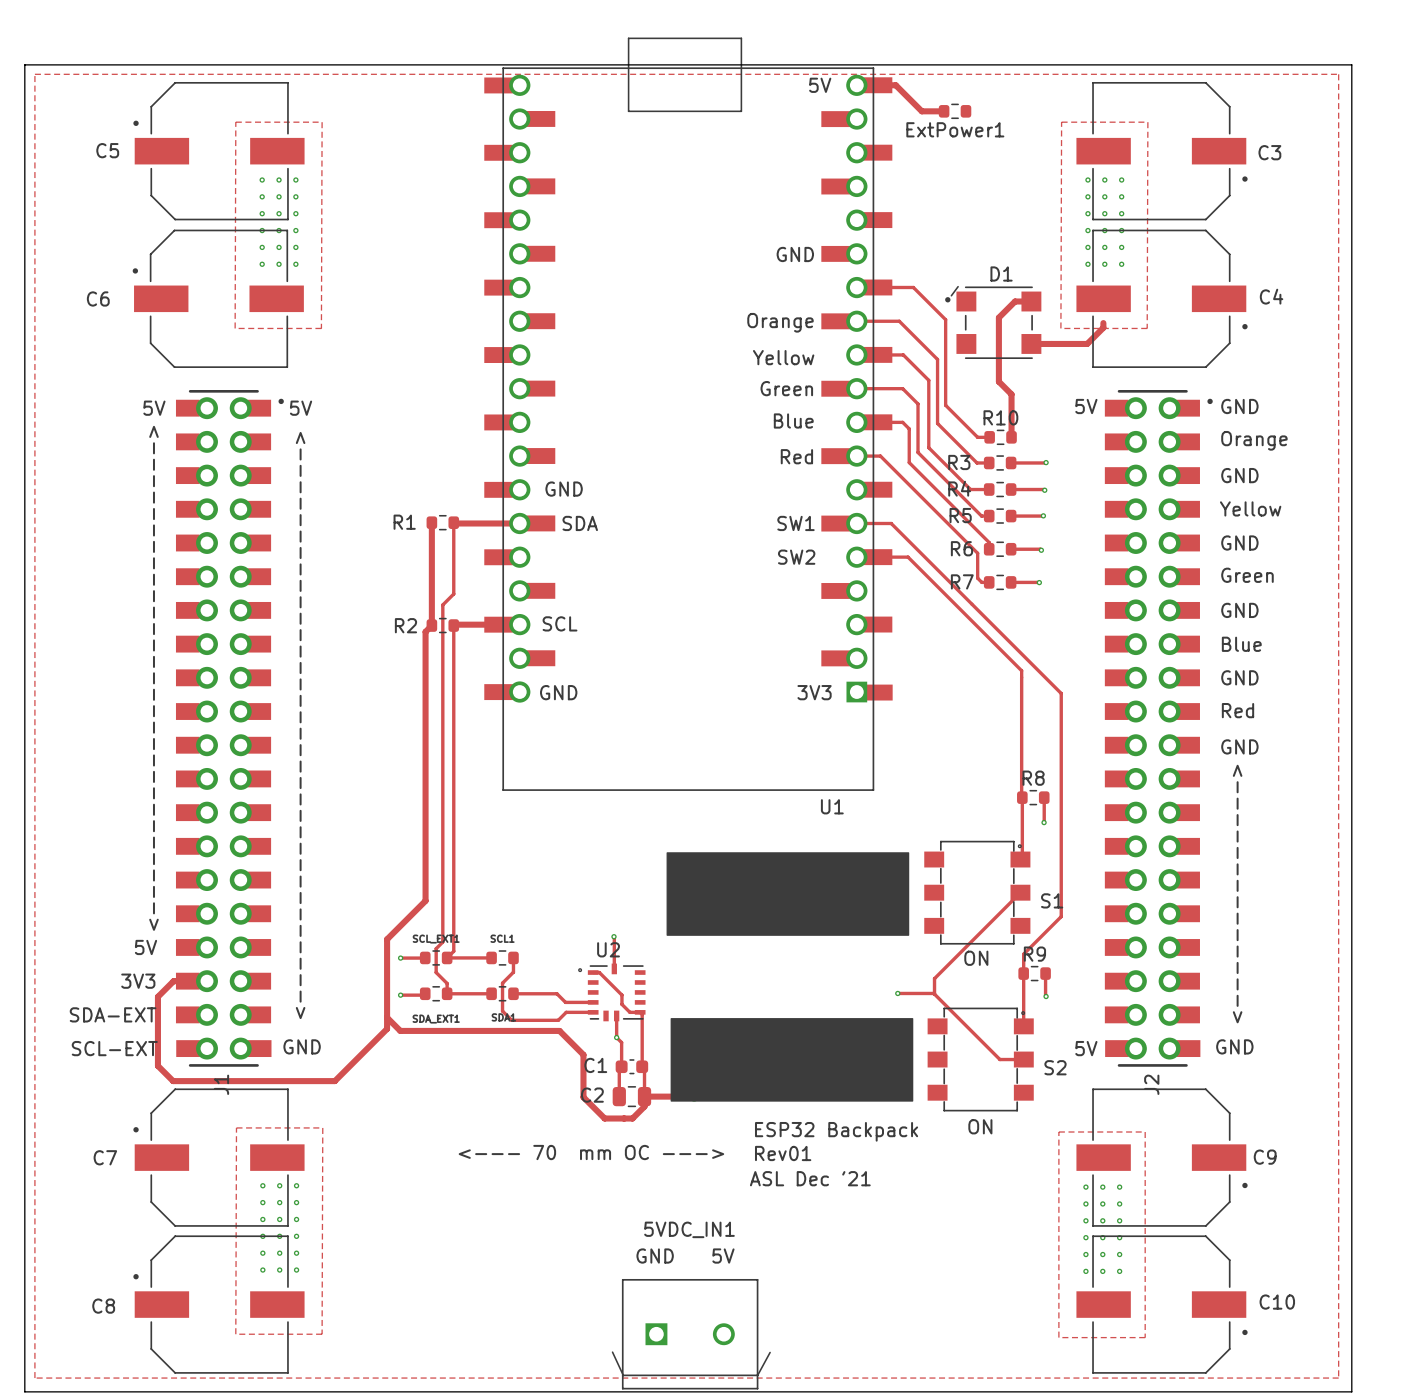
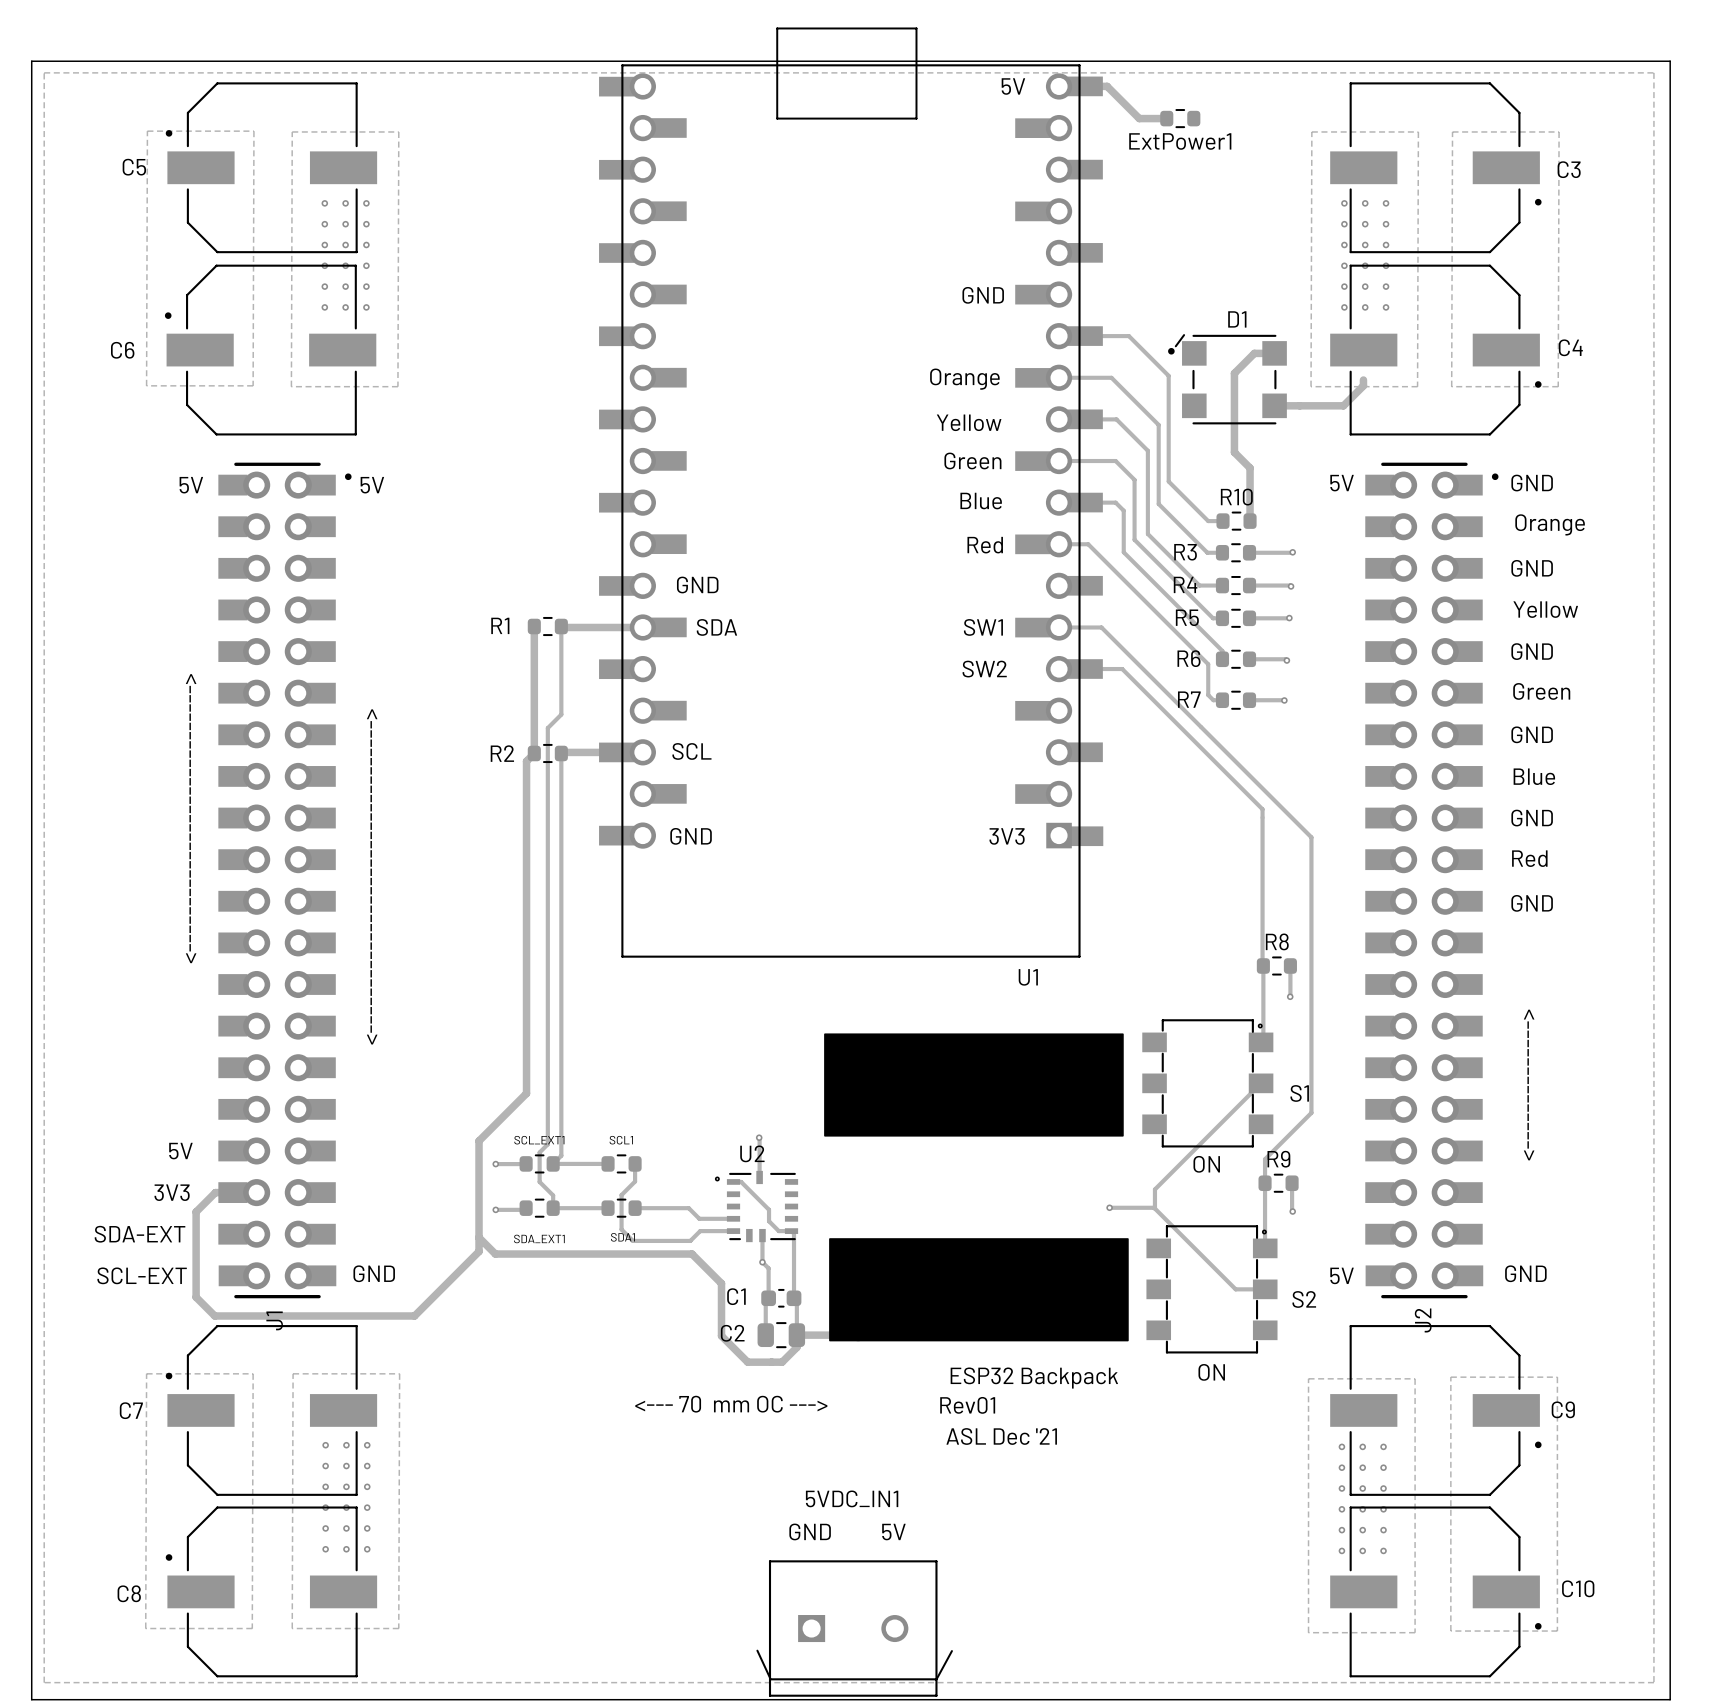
zone outline: none -> (147, 131) (146, 385) (253, 385) (253, 131) (147, 131)
zone outline: none -> (1452, 131) (1559, 131) (1558, 386) (1451, 386) (1452, 131)
zone outline: none -> (146, 1373) (253, 1373) (252, 1628) (145, 1628) (146, 1373)
zone outline: none -> (1450, 1377) (1450, 1631) (1557, 1631) (1557, 1377) (1450, 1377)

